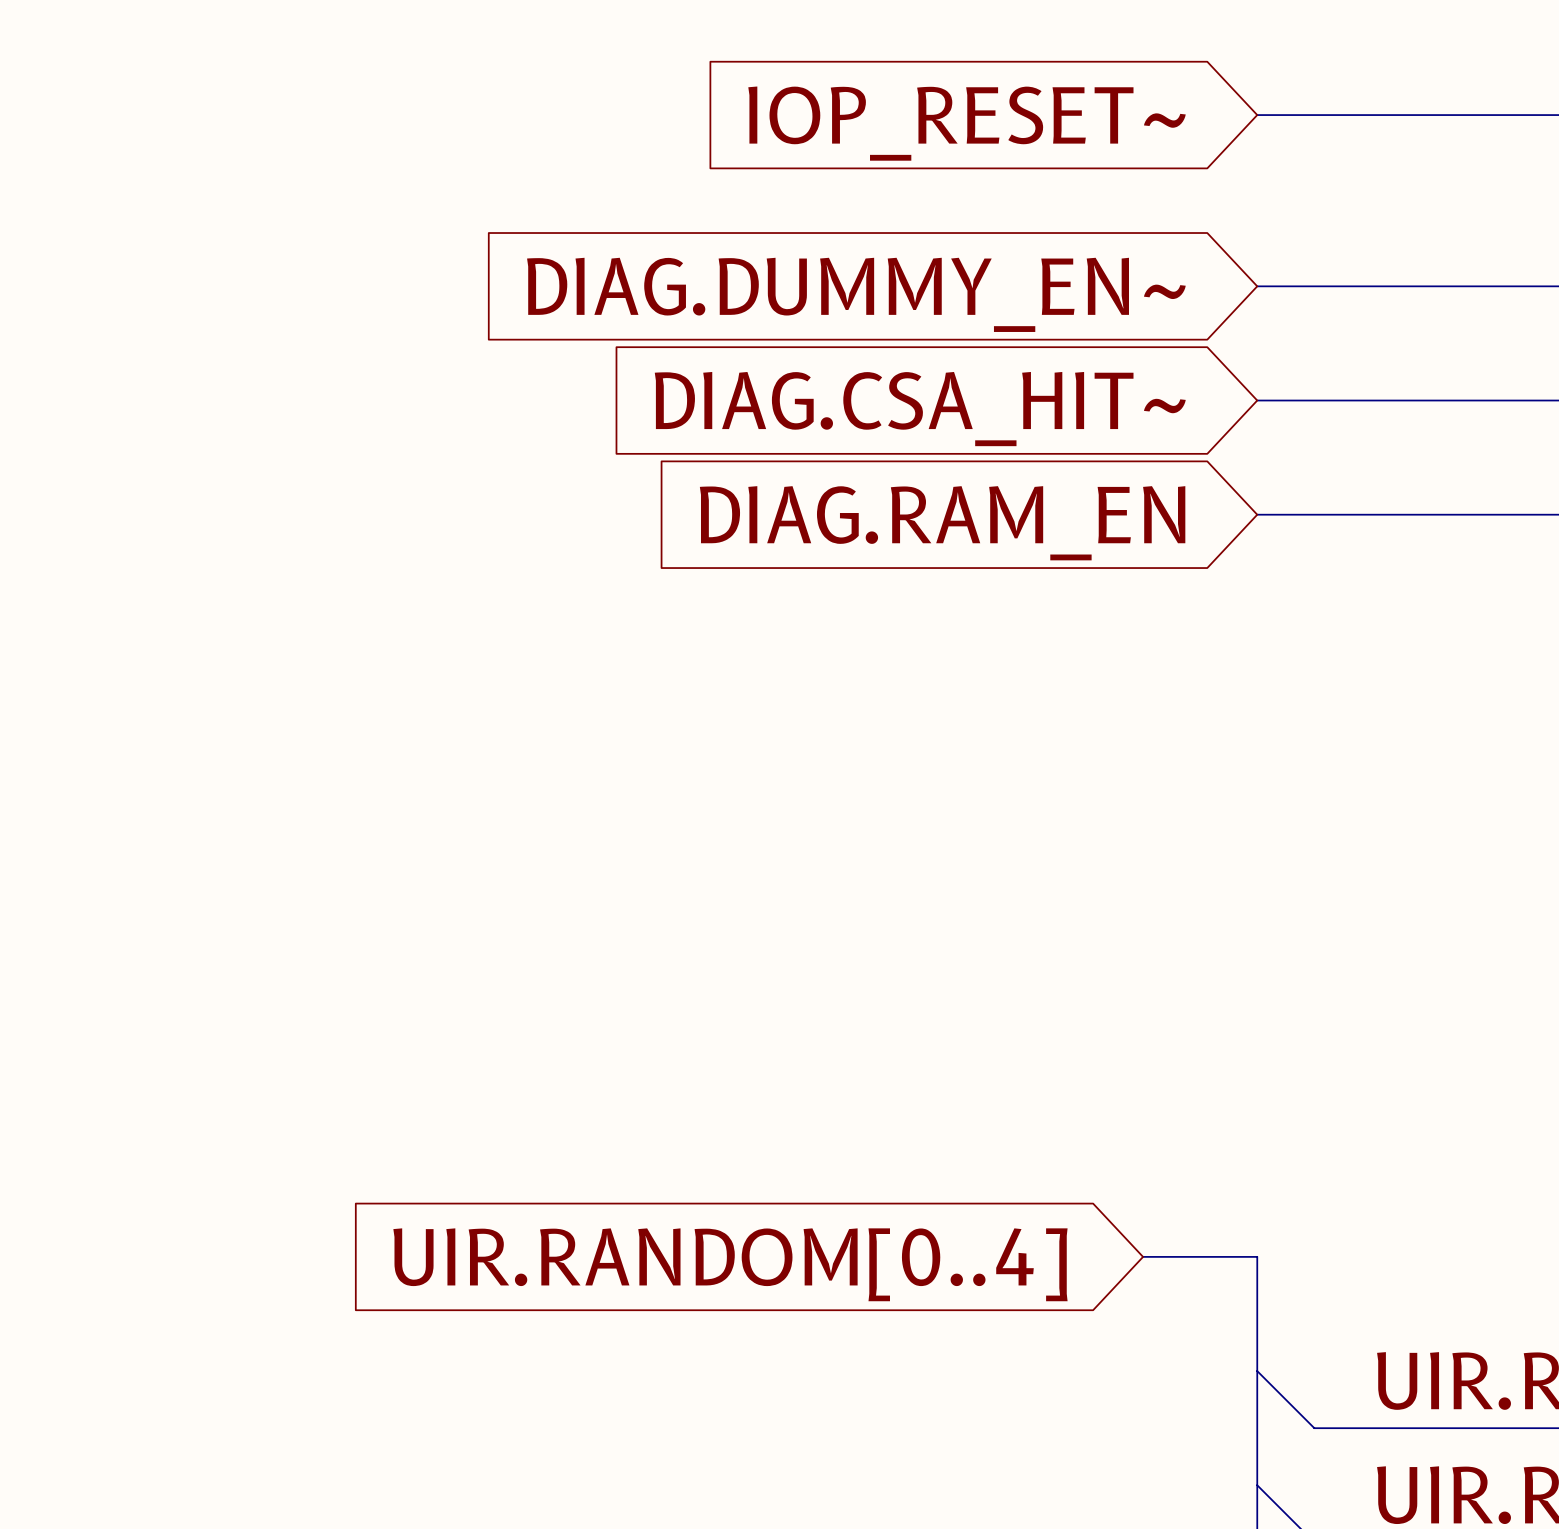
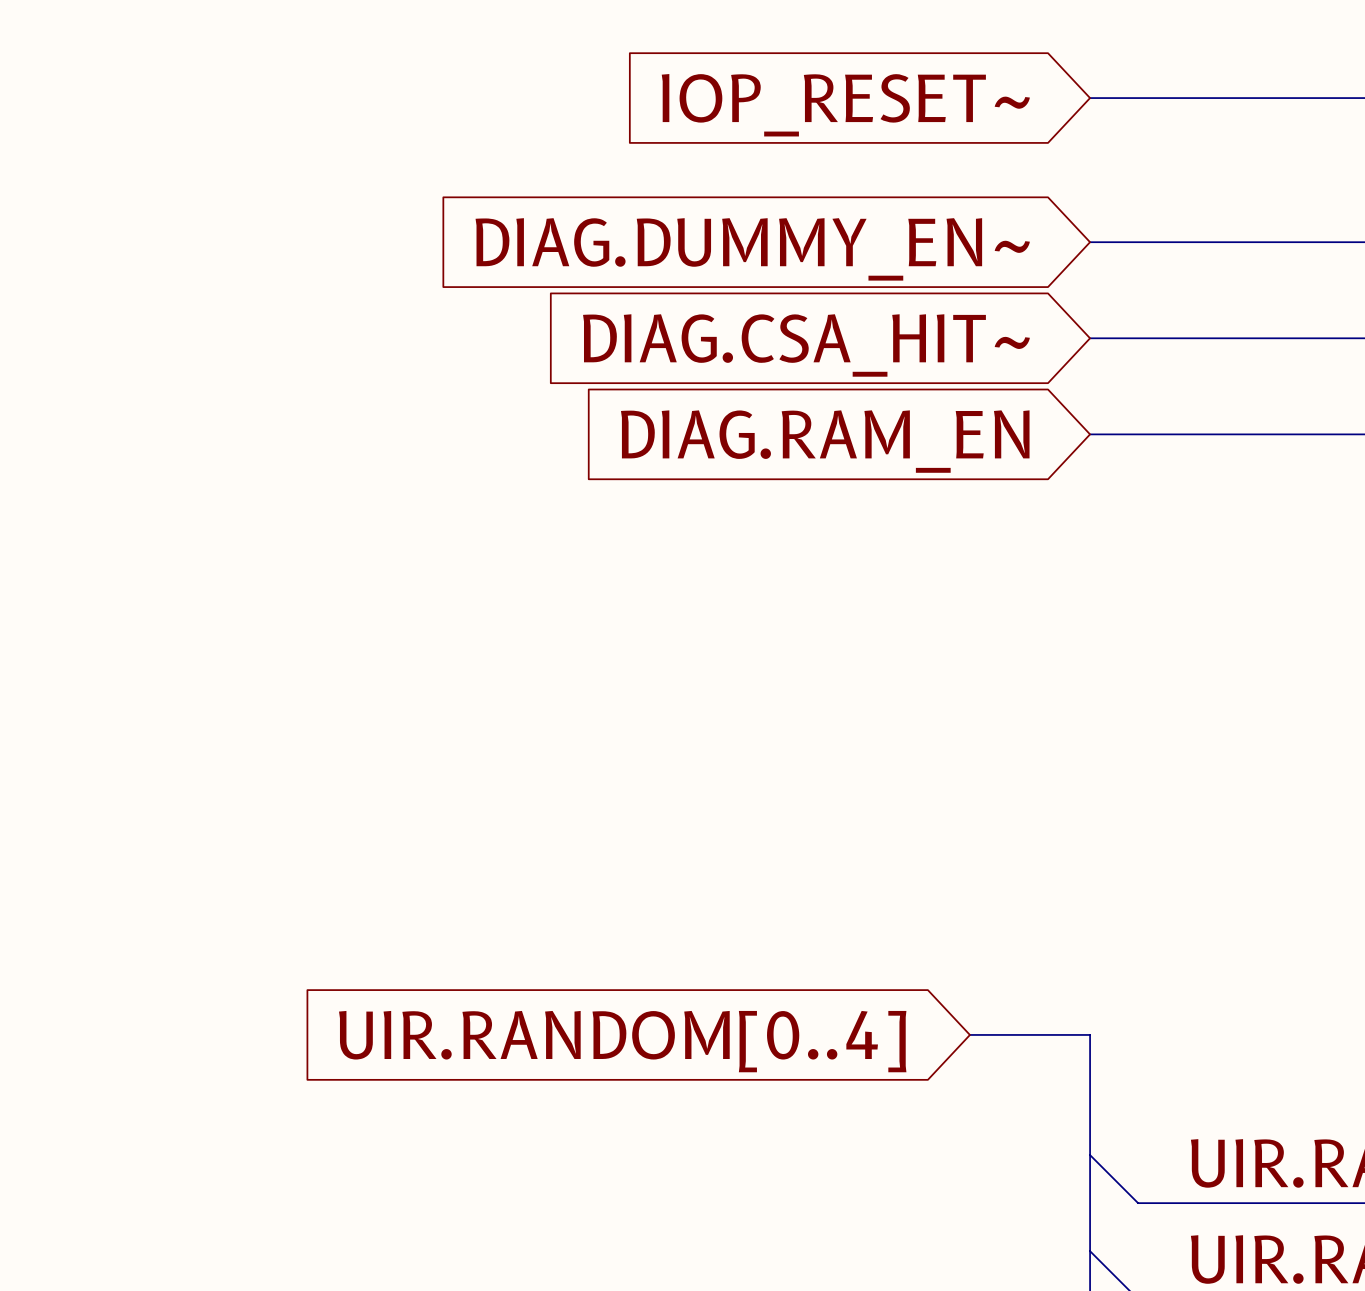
bus: (1143, 1256) (1257, 1256) -> (969, 1034) (1090, 1034) (1090, 1058)
global label position: UIR.RANDOM[0..4] (730, 1264) -> UIR.RANDOM[0..4] (622, 1041)

